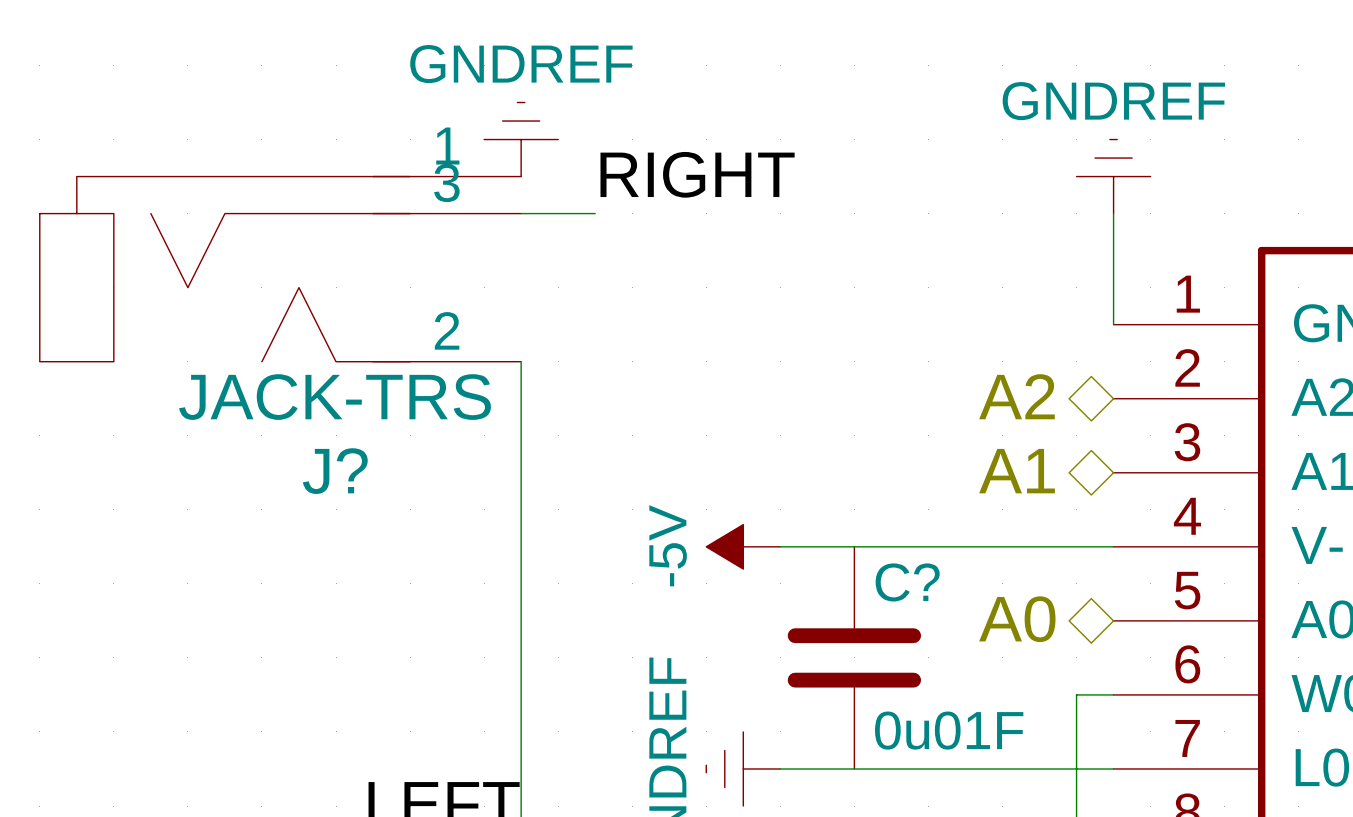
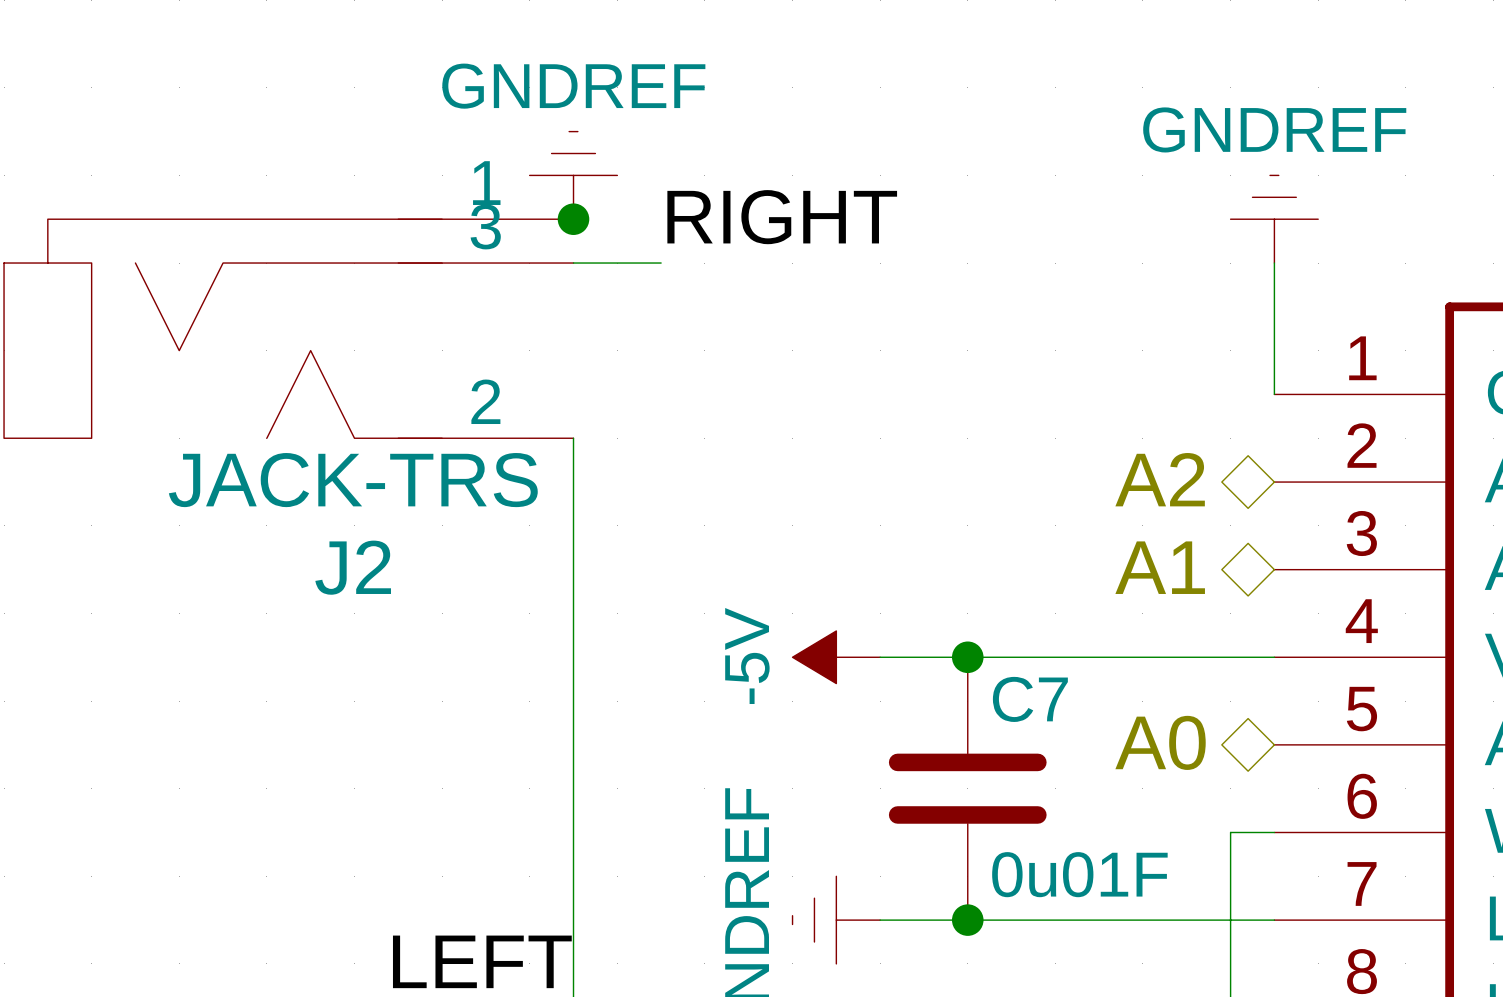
junction: none -> (573, 219)
J? name: J? (335, 471) -> J2 (353, 567)
junction: none -> (967, 657)
C? name: C? (907, 582) -> C7 (1030, 699)
junction: none -> (967, 920)

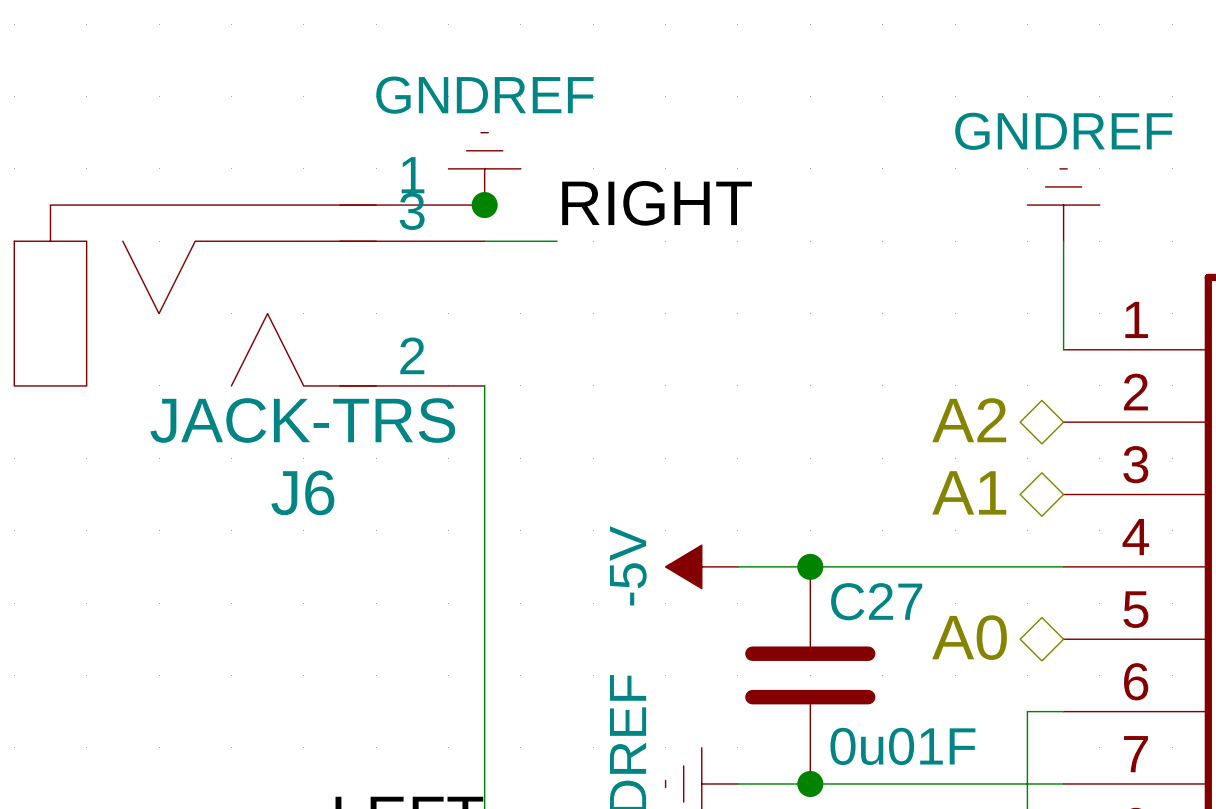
J2 name: J2 (353, 567) -> J6 (302, 492)
C7 name: C7 (1030, 699) -> C27 (876, 601)

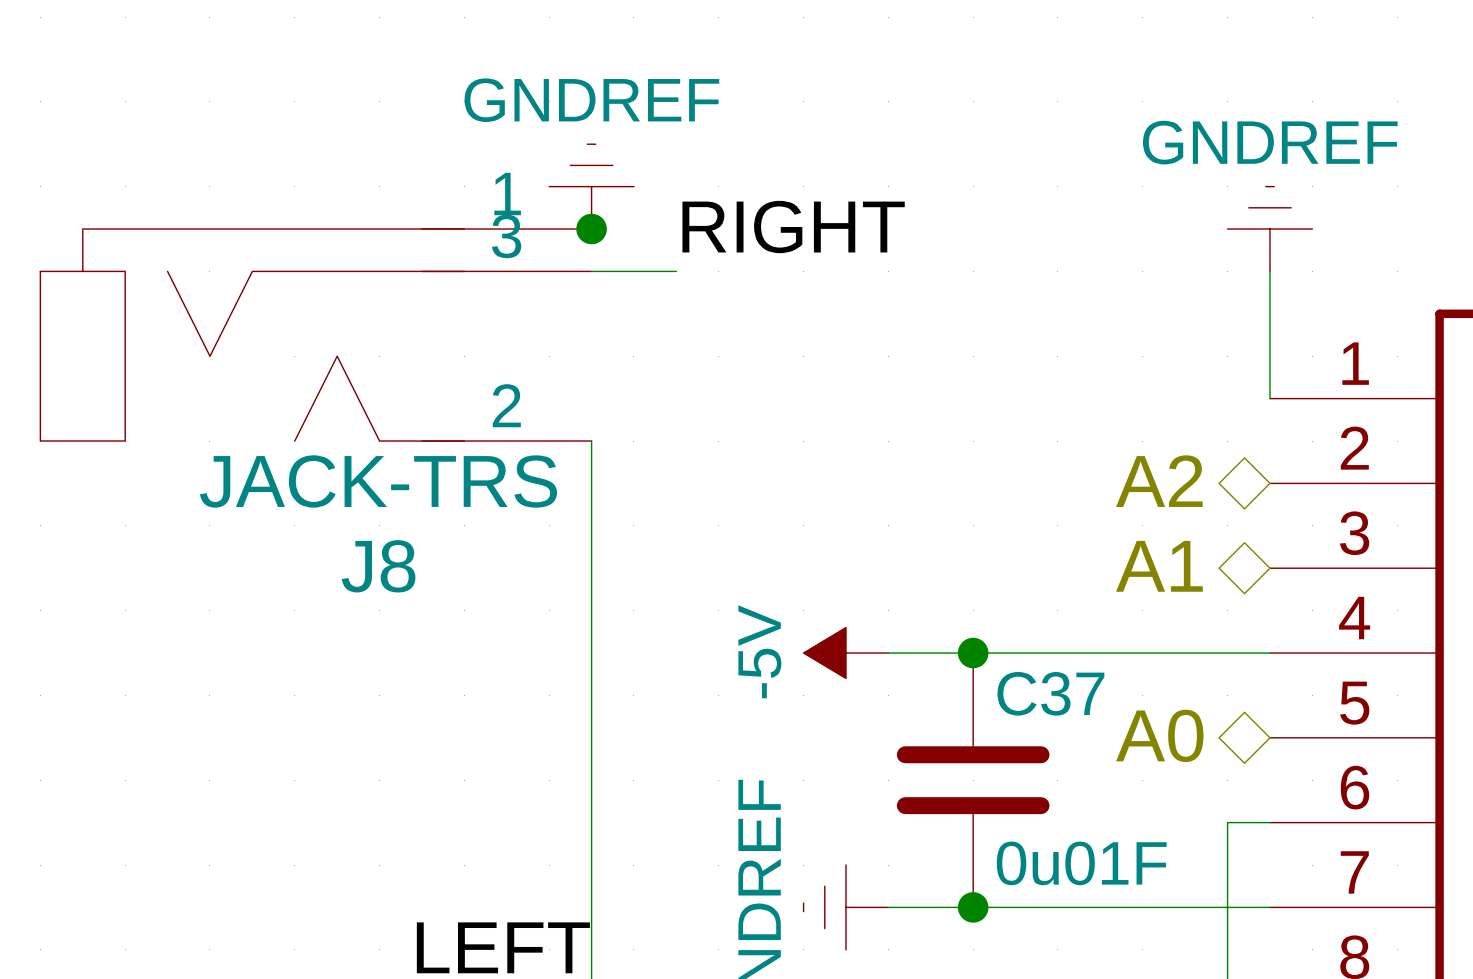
J6 name: J6 (302, 492) -> J8 (378, 566)
C27 name: C27 (876, 601) -> C37 (1050, 693)

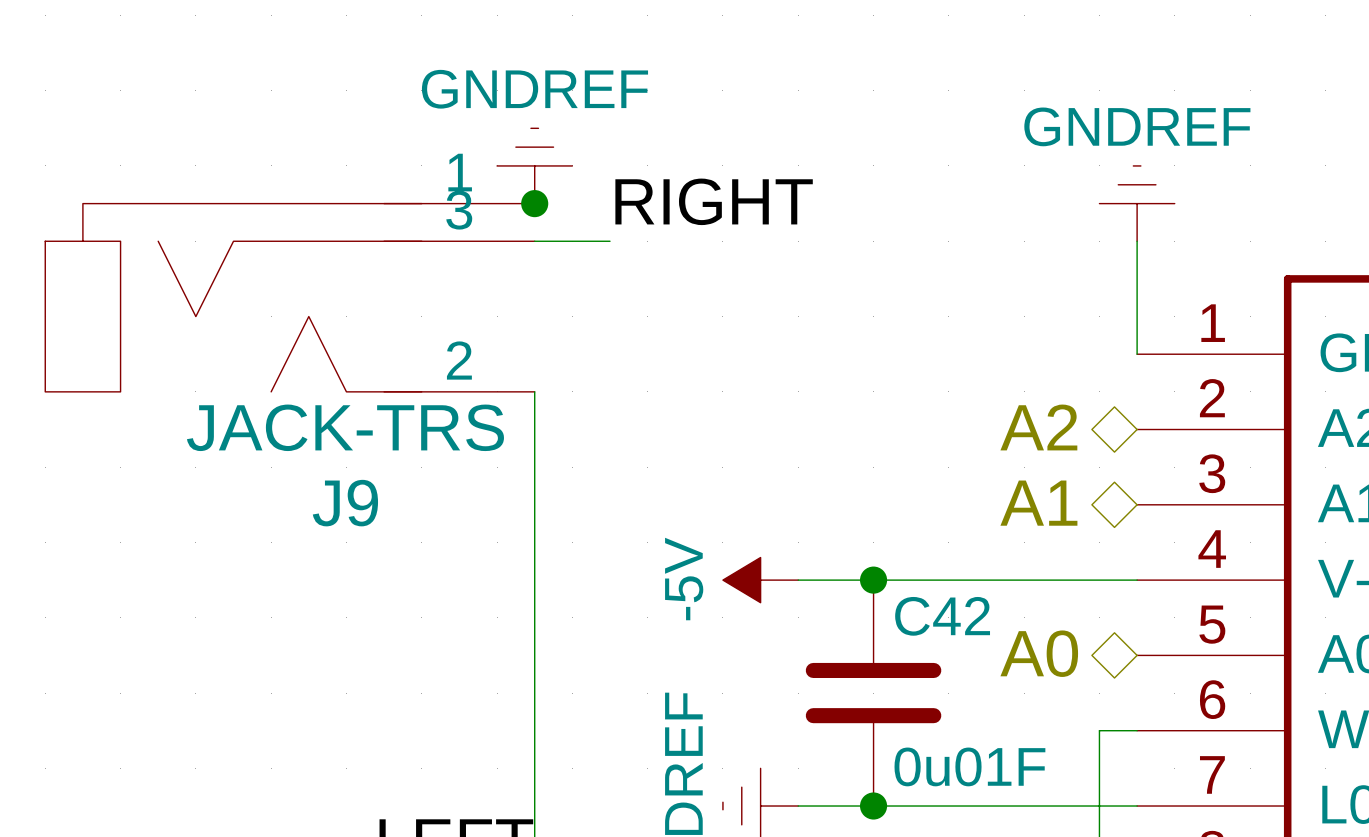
J8 name: J8 (378, 566) -> J9 (345, 503)
C37 name: C37 (1050, 693) -> C42 (942, 616)

